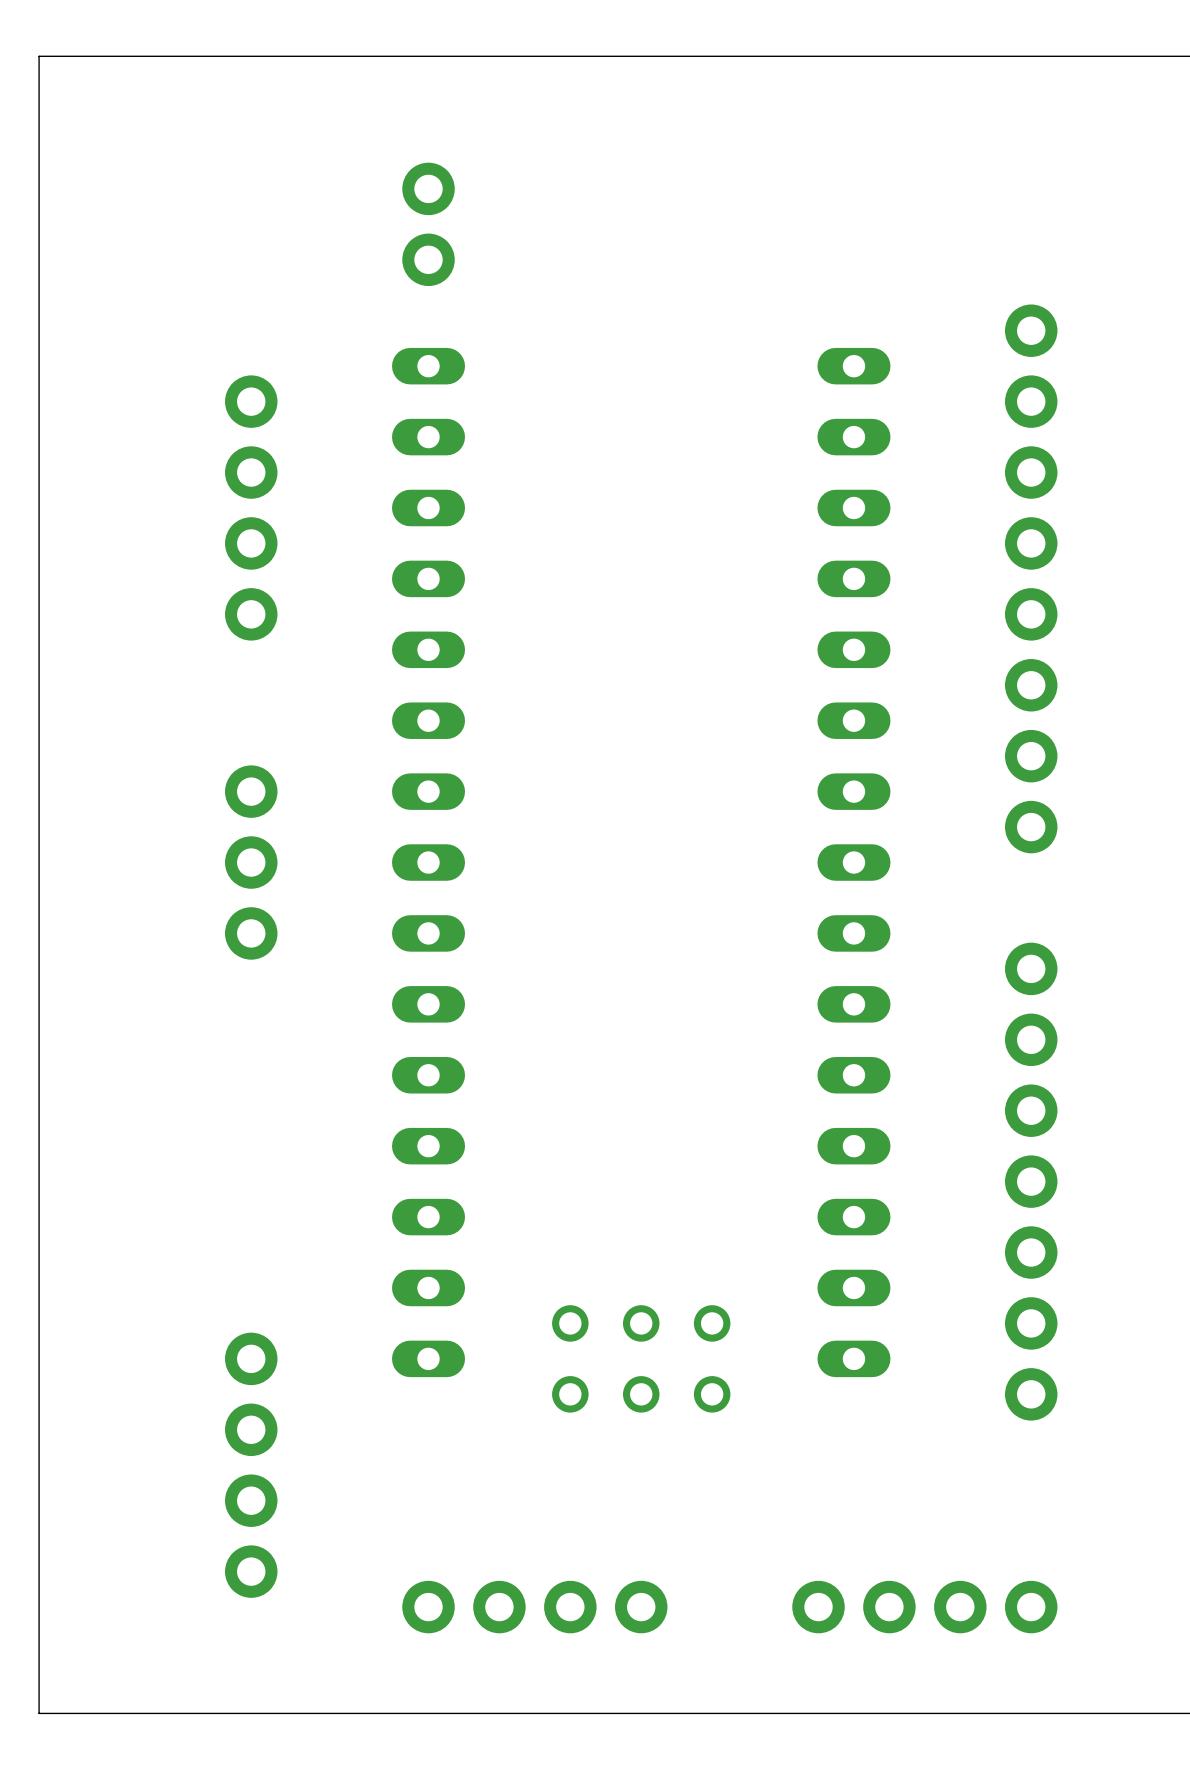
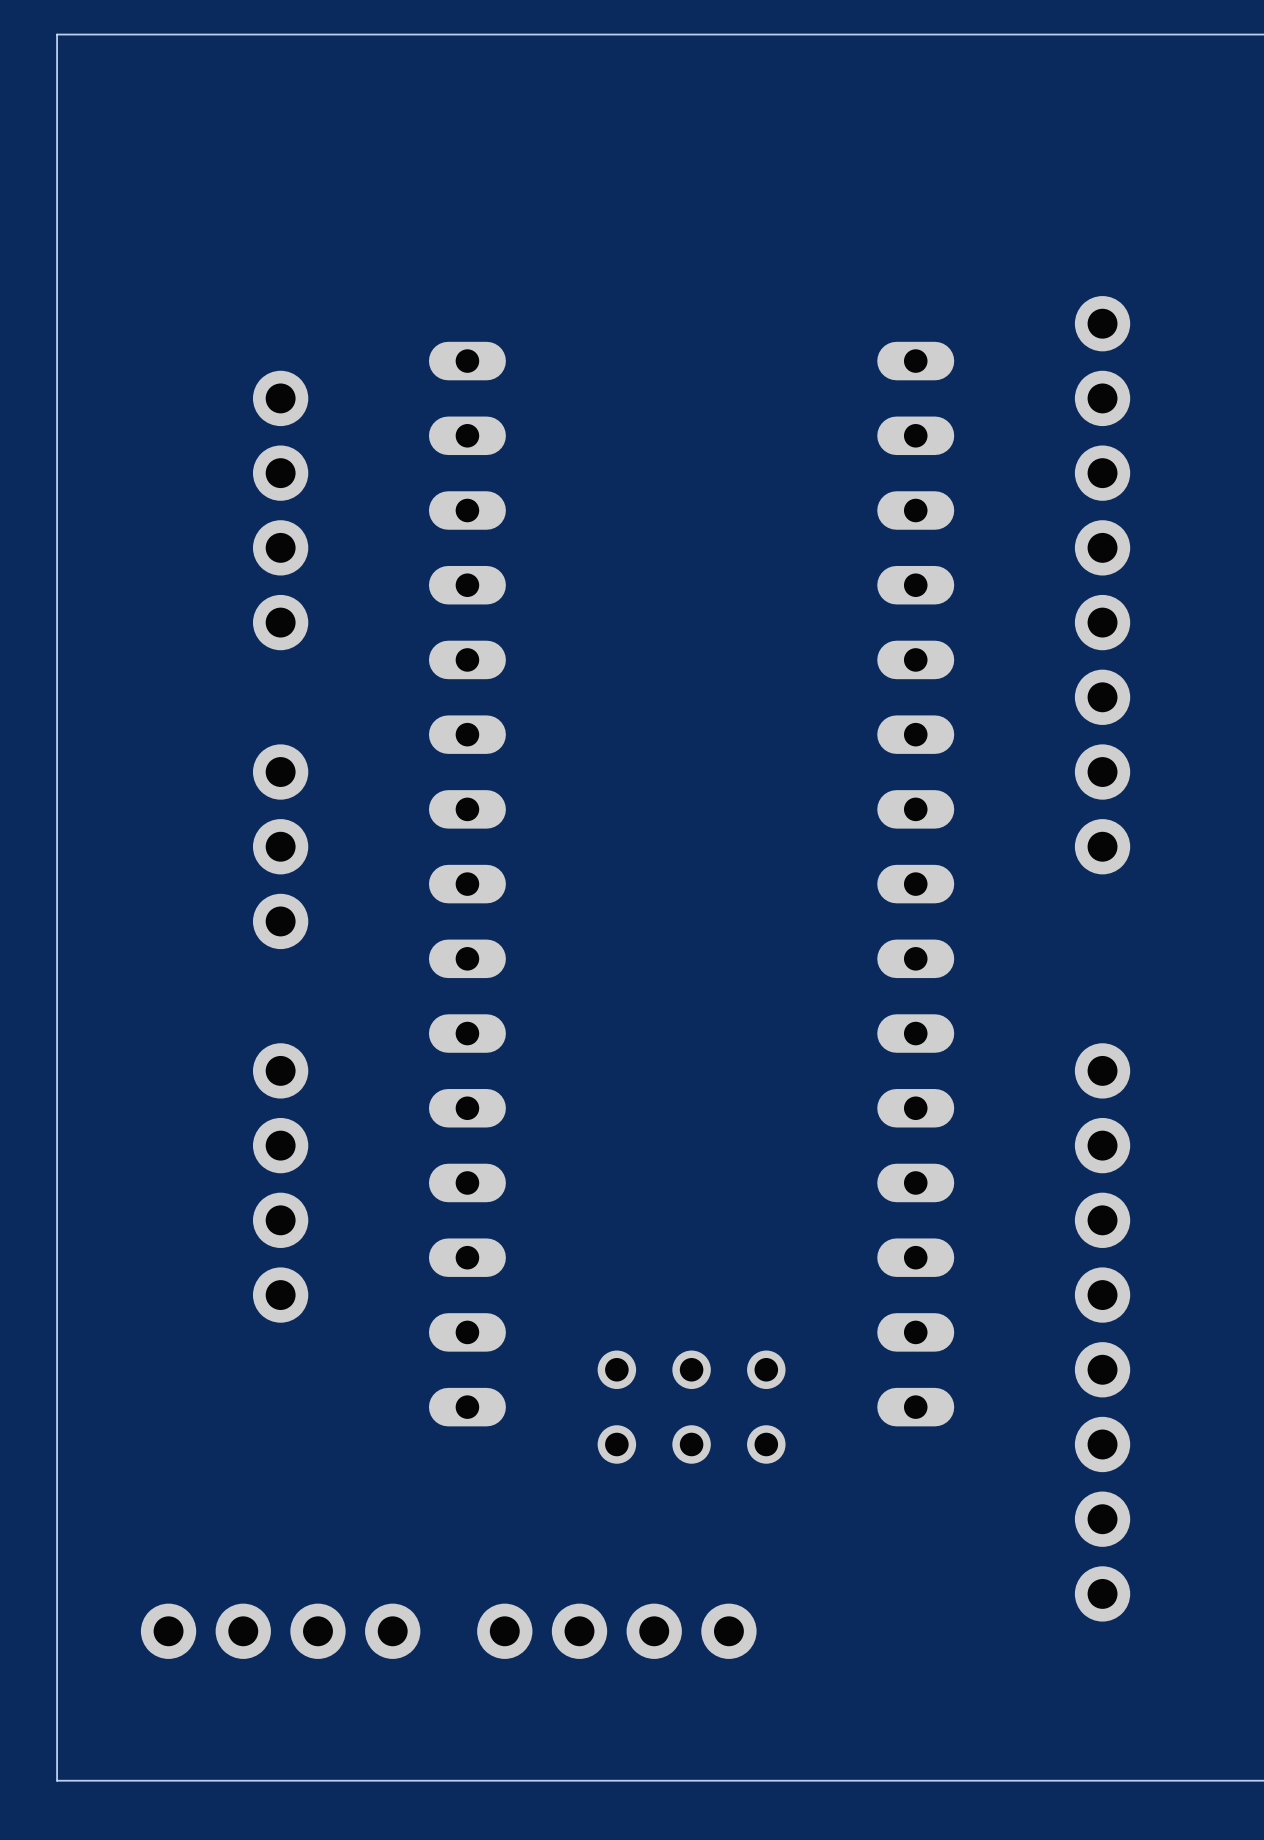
part: (428, 224) -> none
part position: (251, 862) -> (280, 846)
part: none -> (280, 1182)
part: (1031, 1181) -> none
part: none -> (1102, 1332)
part rotation: 0° (251, 1465) -> 90° clockwise (280, 1631)
part position: (534, 1607) -> (616, 1631)
part: (924, 1607) -> none

